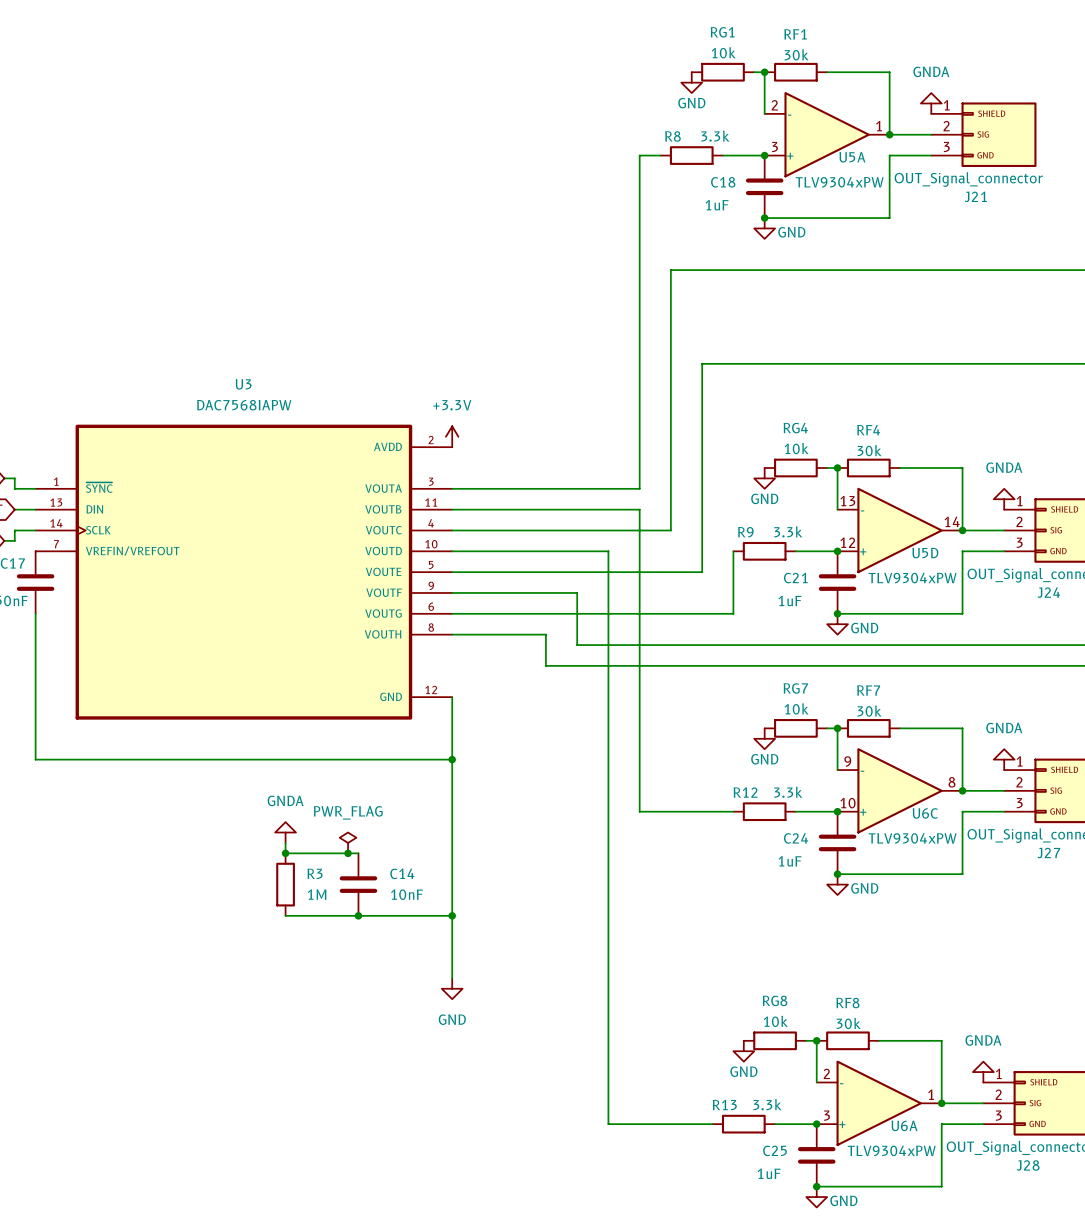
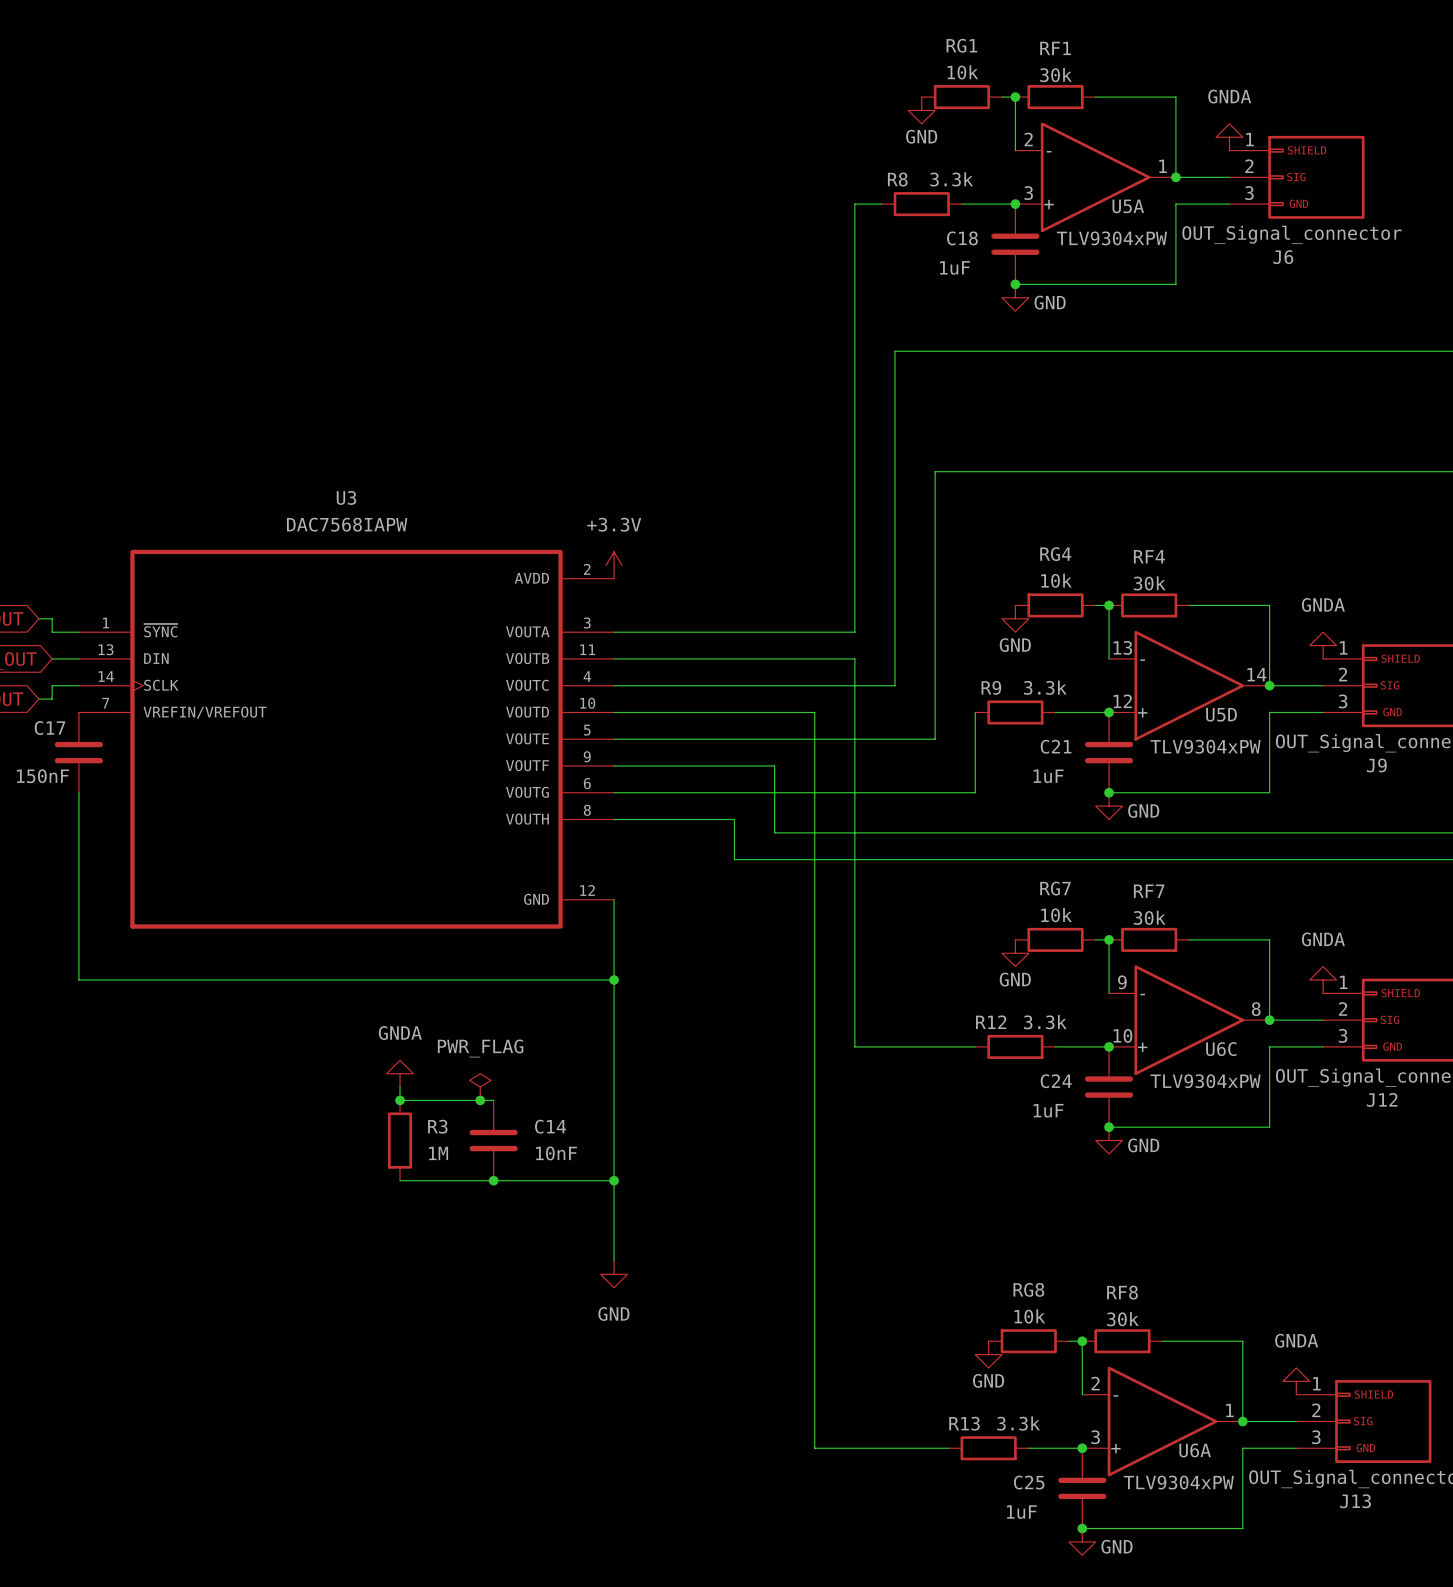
J21 name: J21 (975, 196) -> J6 (1283, 257)
J24 name: J24 (1048, 592) -> J9 (1376, 765)
J27 name: J27 (1048, 853) -> J12 (1382, 1099)
J28 name: J28 (1028, 1165) -> J13 (1355, 1501)

